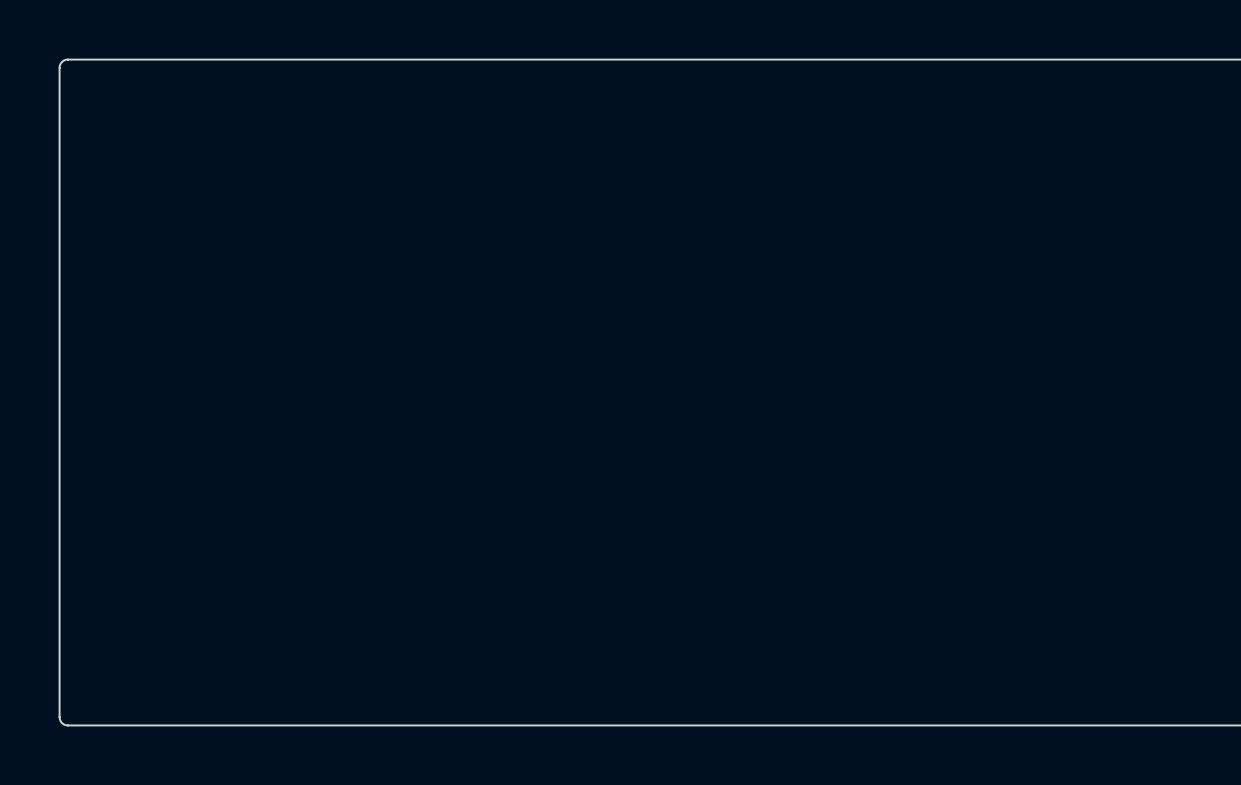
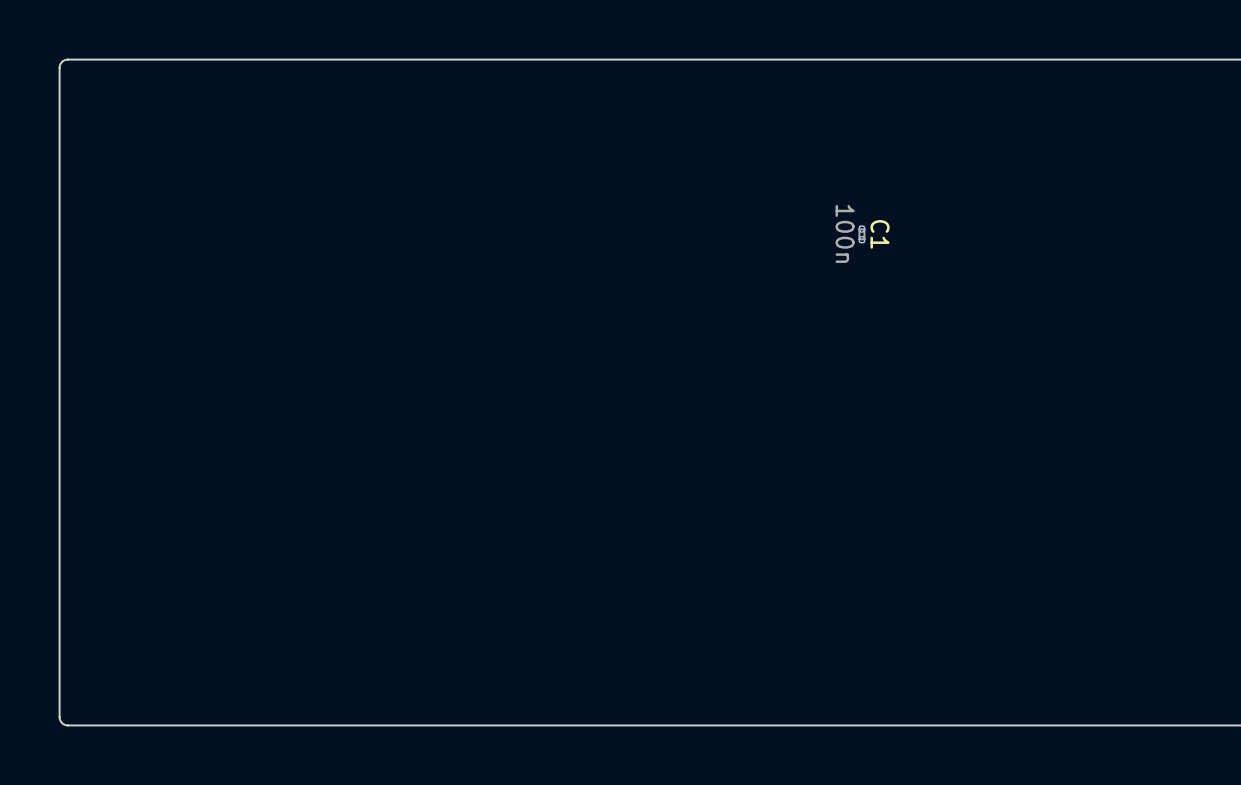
via: none -> (861, 229)
C1: none -> 100n (861, 234)
via: none -> (861, 239)

